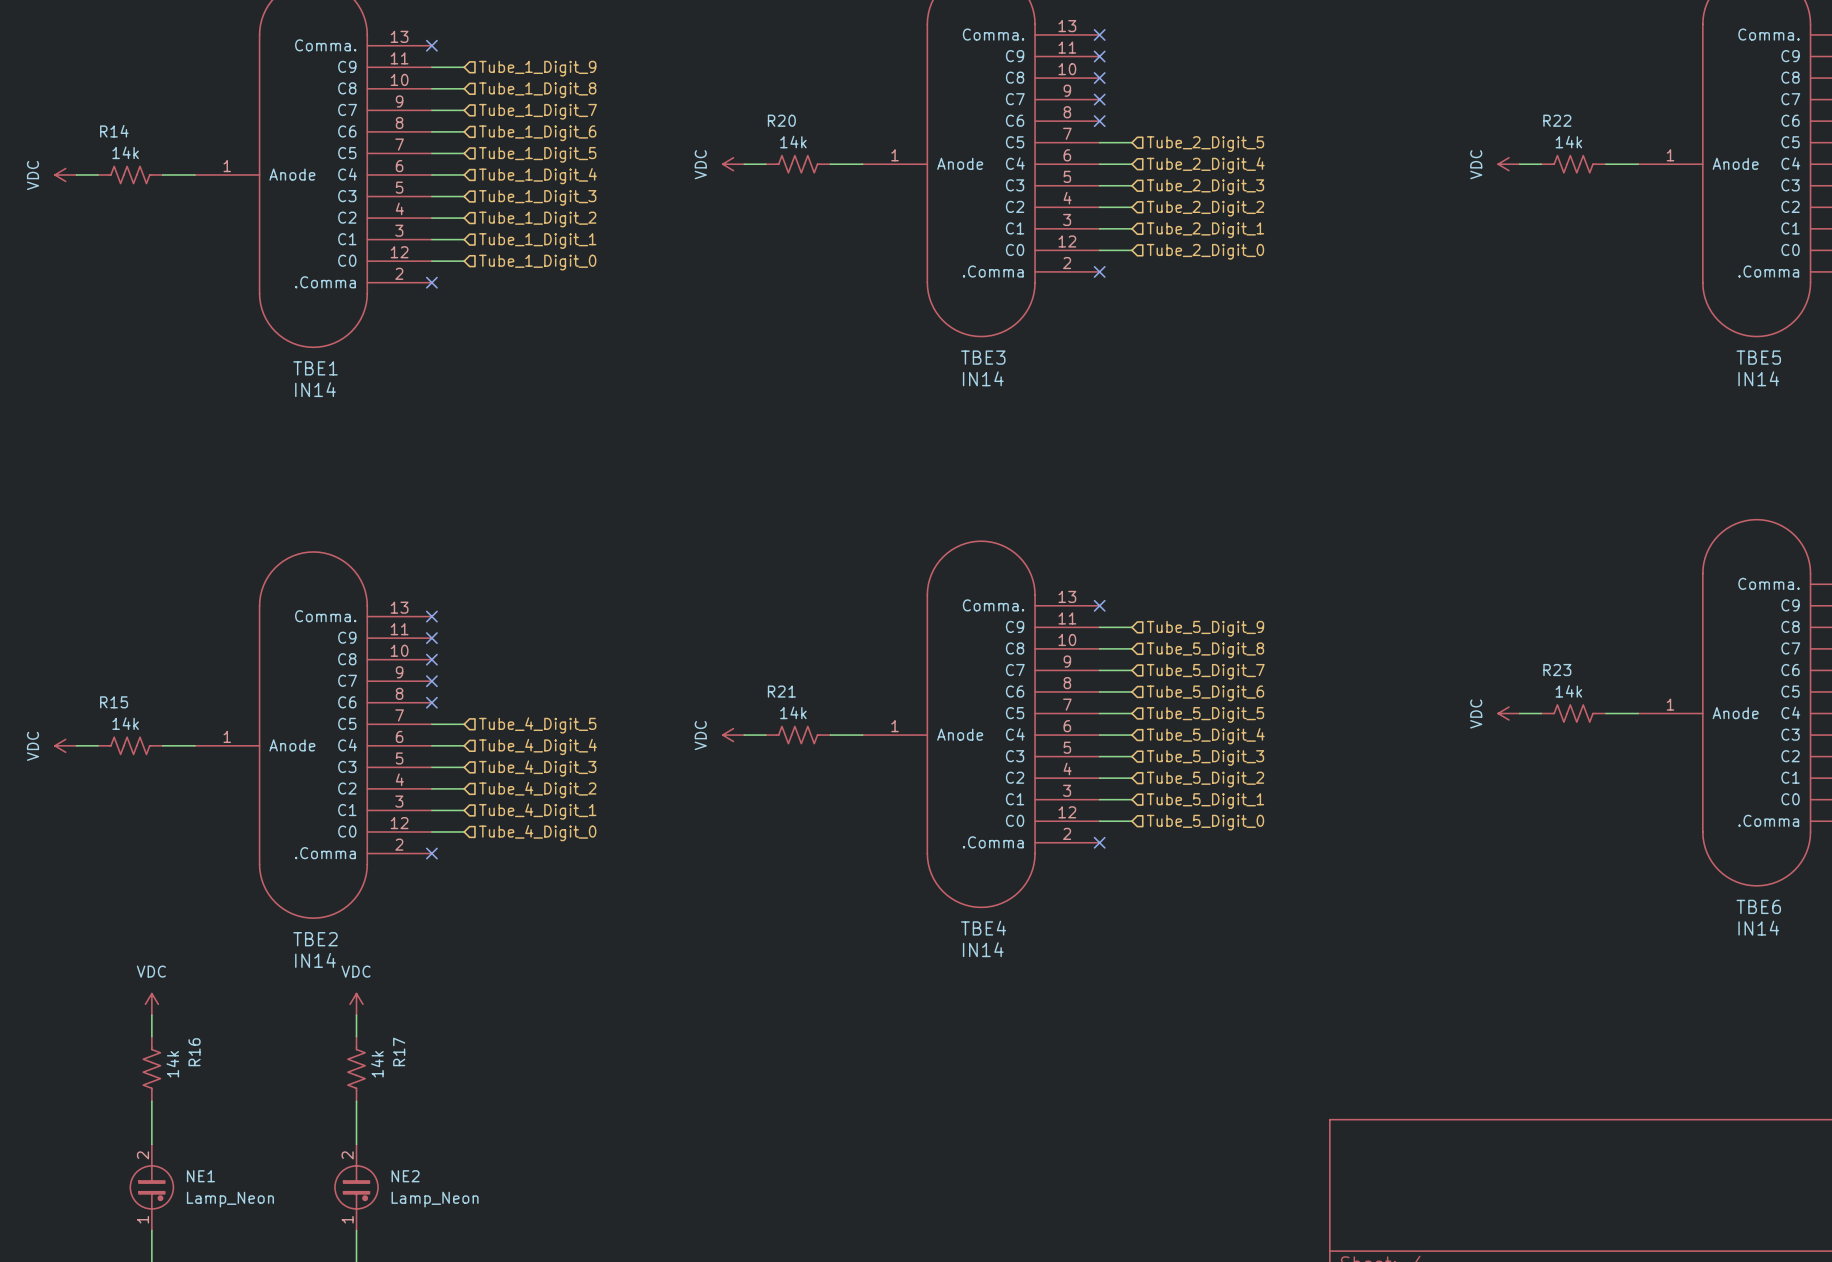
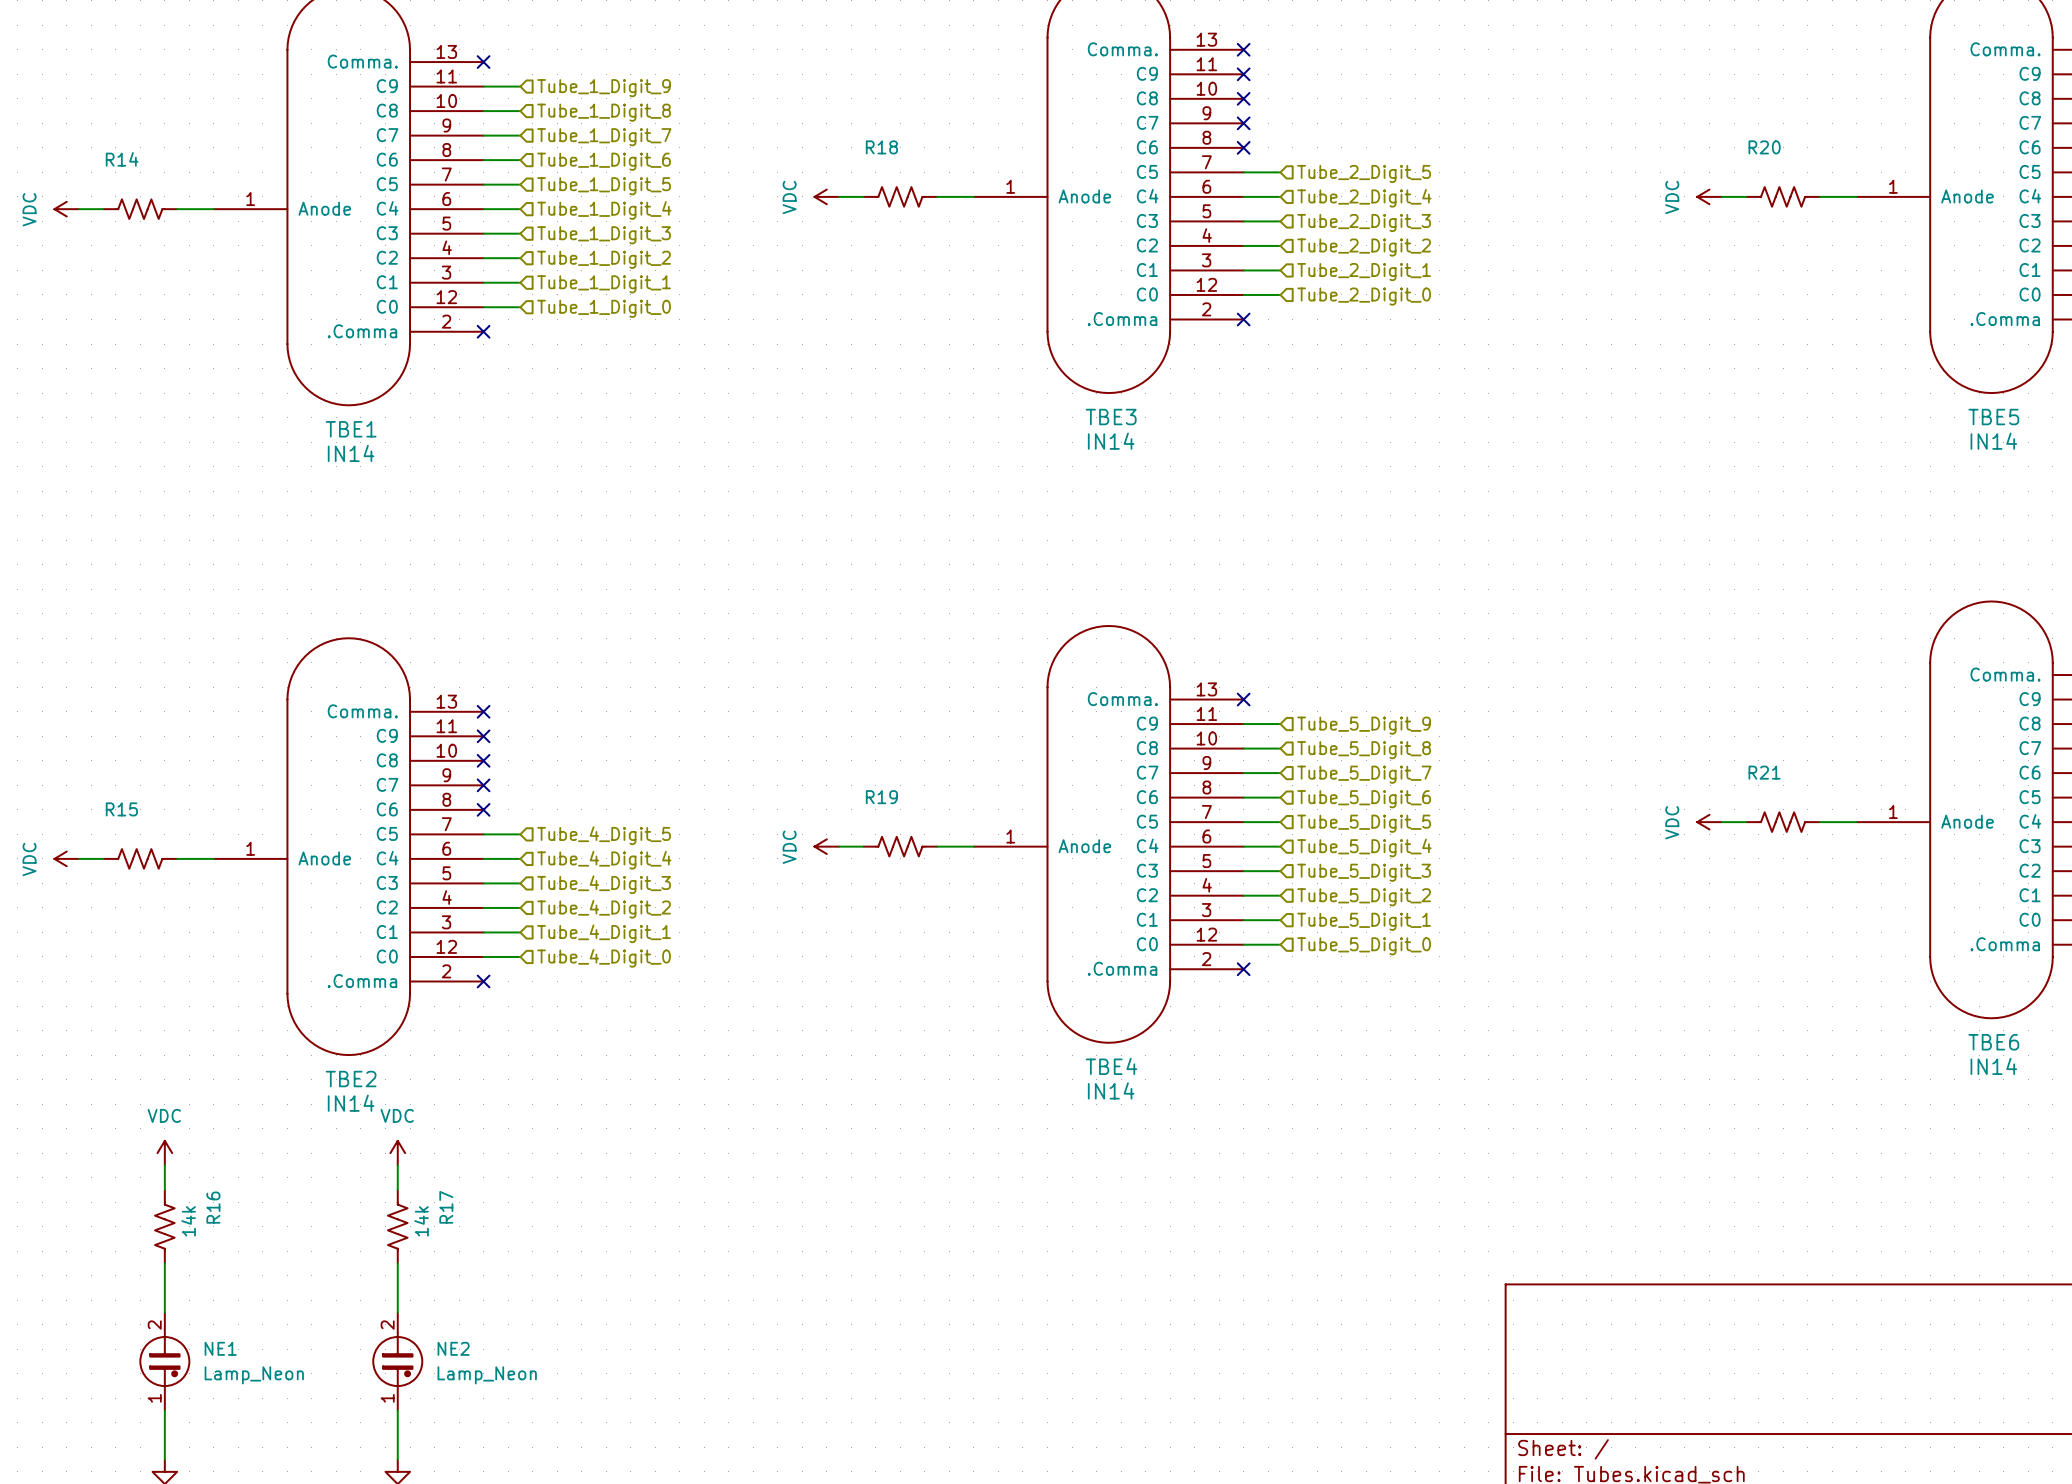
R20 name: R20 (781, 120) -> R18 (881, 147)
R22 name: R22 (1557, 120) -> R20 (1764, 147)
R20 value: 14k (793, 142) -> none
R22 value: 14k (1568, 142) -> none
R14 value: 14k (125, 152) -> none
R23 name: R23 (1557, 670) -> R21 (1764, 772)
R21 name: R21 (781, 691) -> R19 (881, 797)
R23 value: 14k (1568, 691) -> none
R21 value: 14k (793, 712) -> none
R15 value: 14k (125, 723) -> none

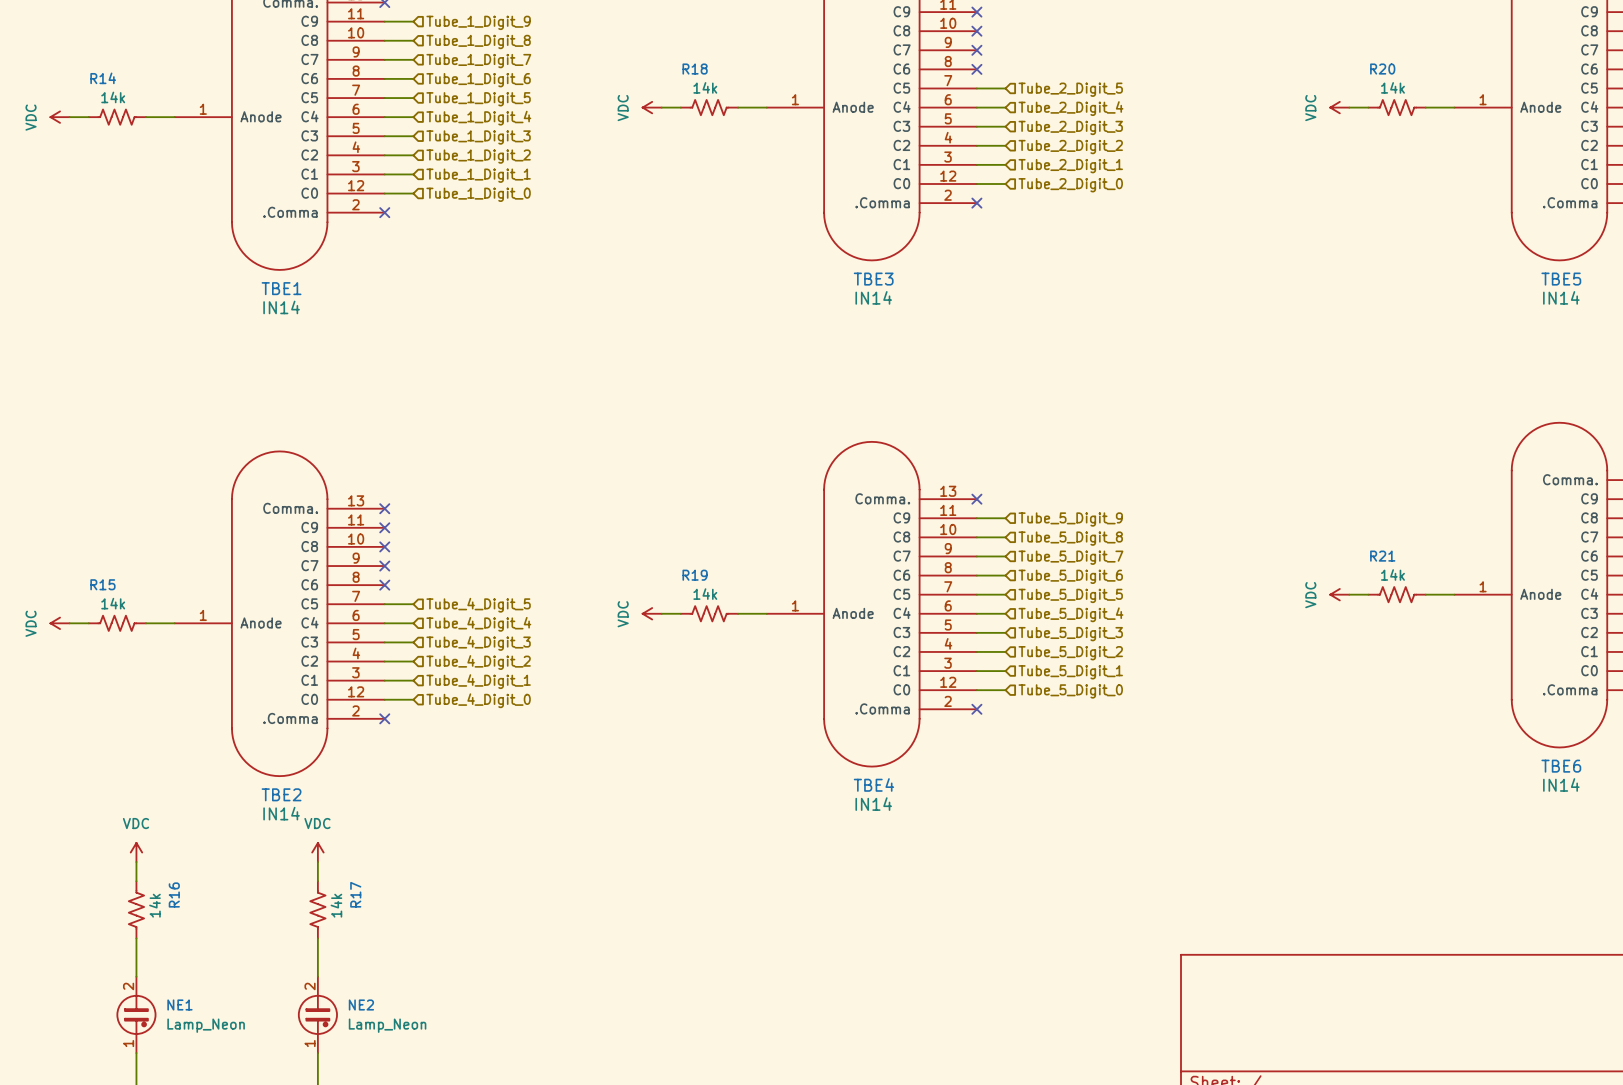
R18 value: none -> 14k (705, 87)
R20 value: none -> 14k (1392, 87)
R14 value: none -> 14k (113, 97)
R21 value: none -> 14k (1392, 574)
R19 value: none -> 14k (705, 594)
R15 value: none -> 14k (113, 603)

